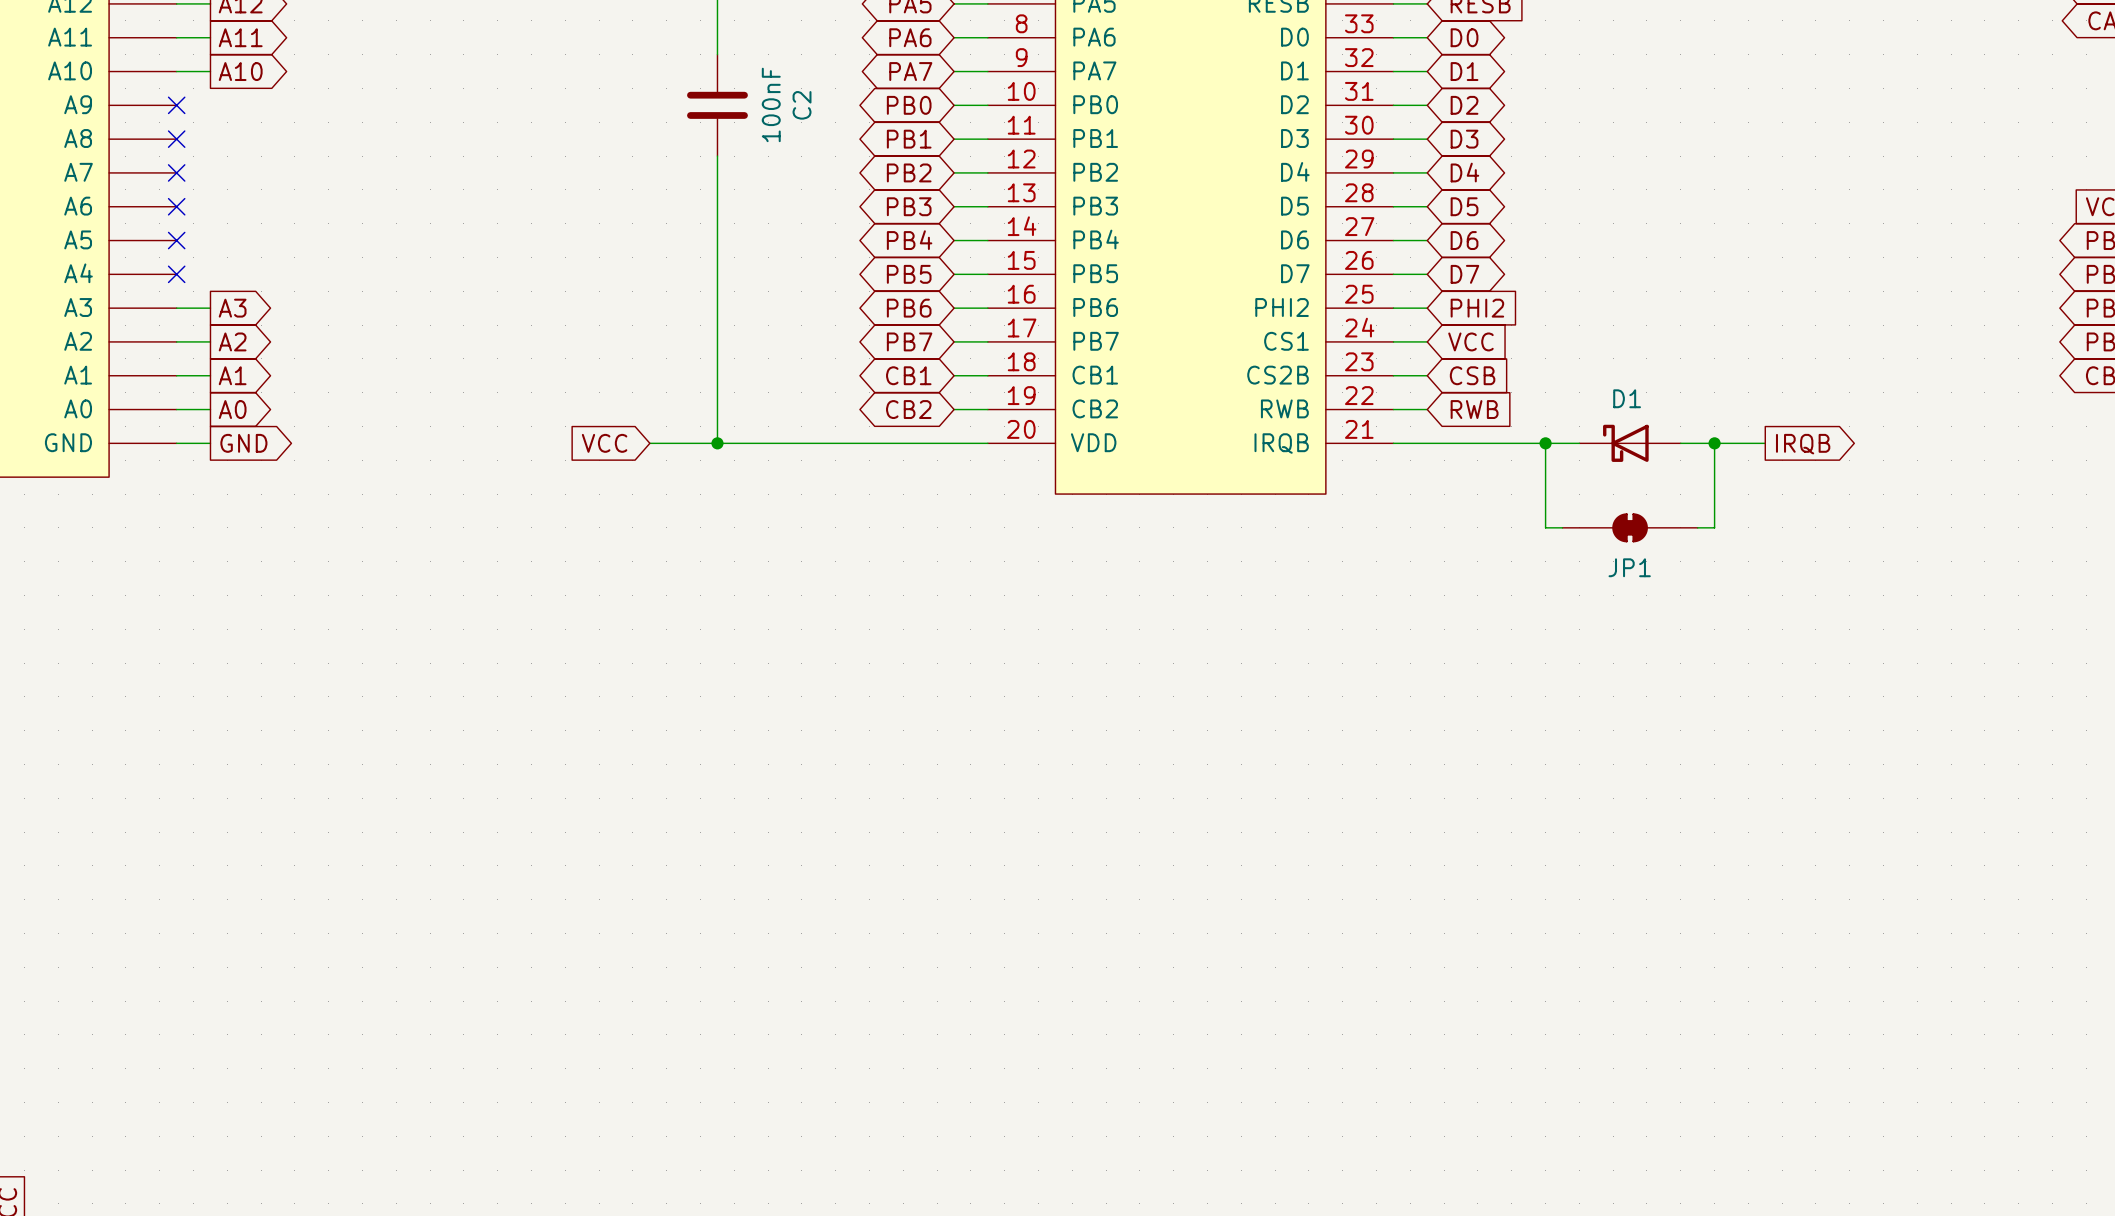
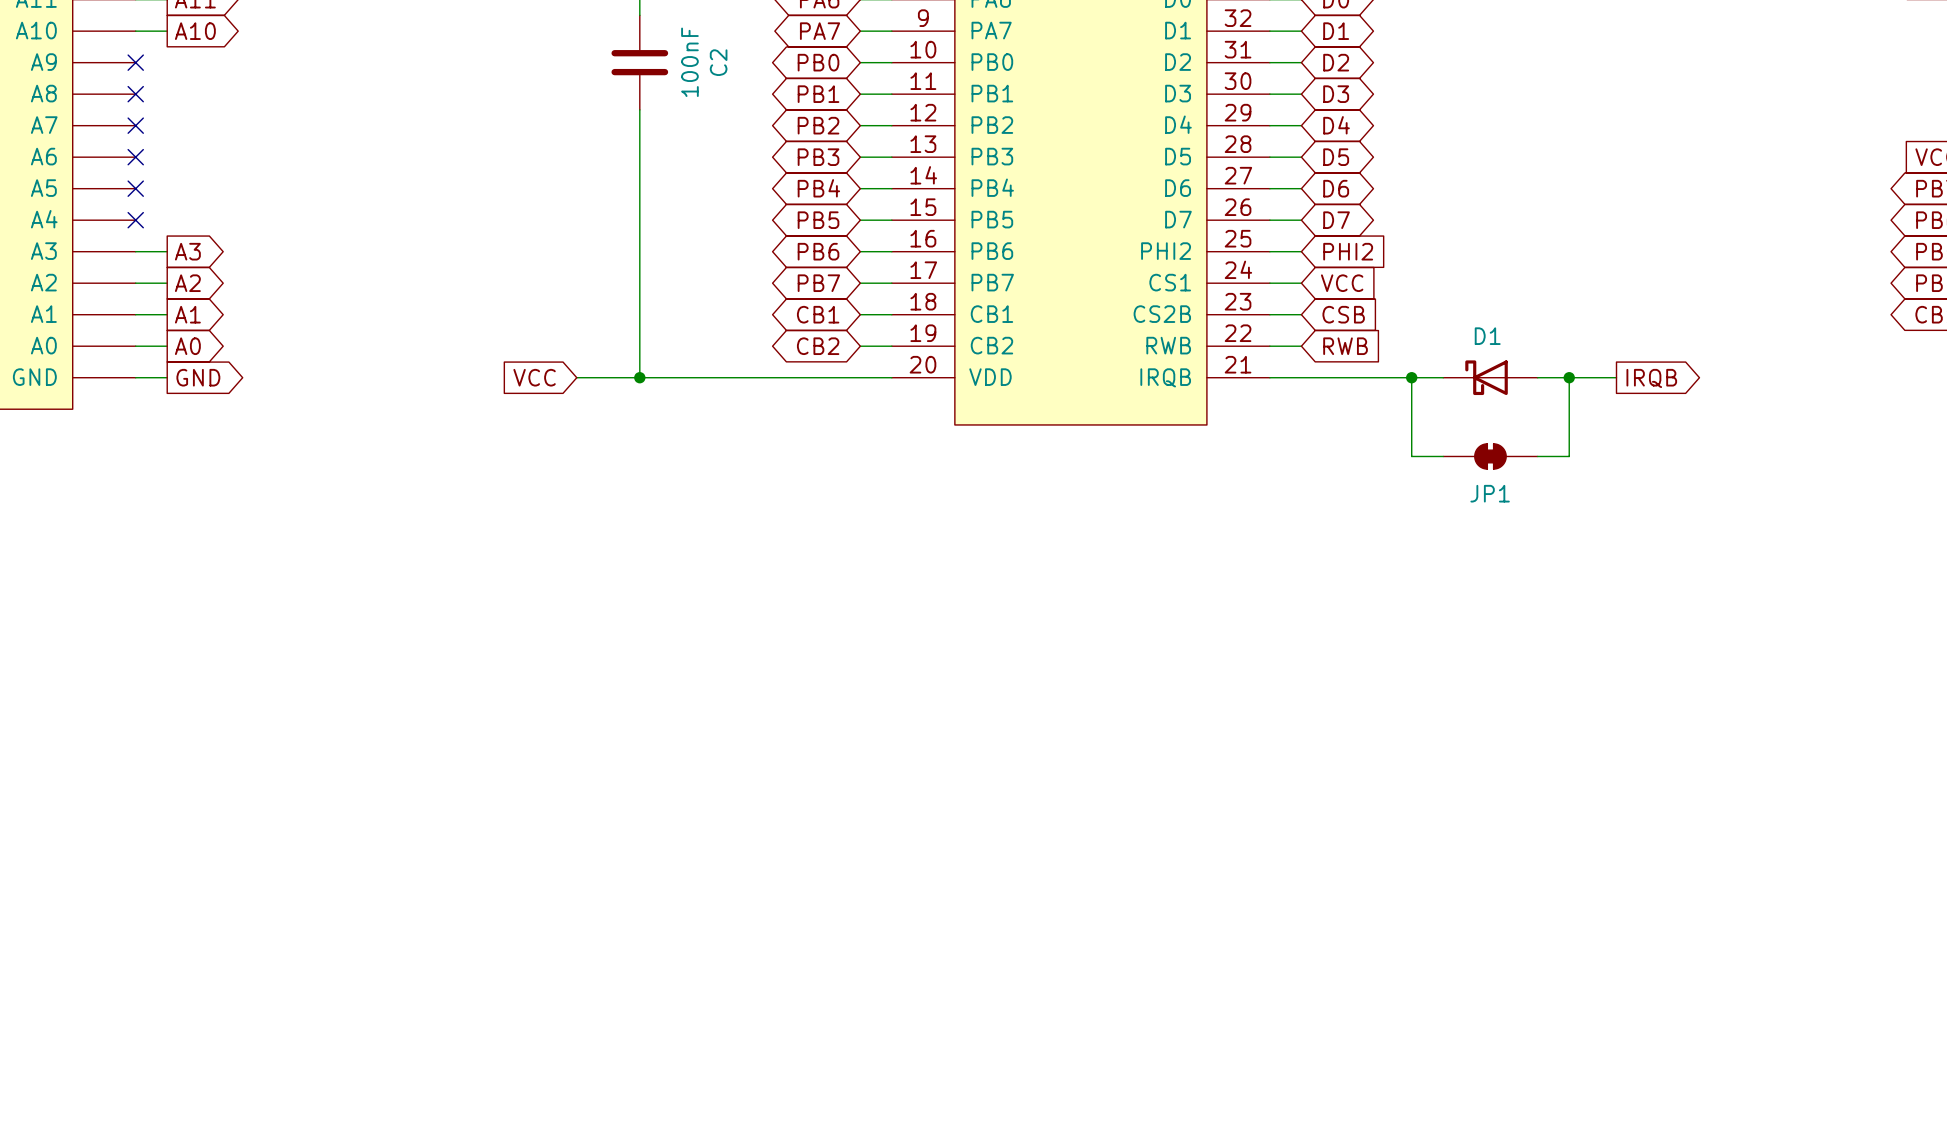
JP1 symbol: [1562, 513, 1698, 543] -> [1443, 443, 1538, 470]

